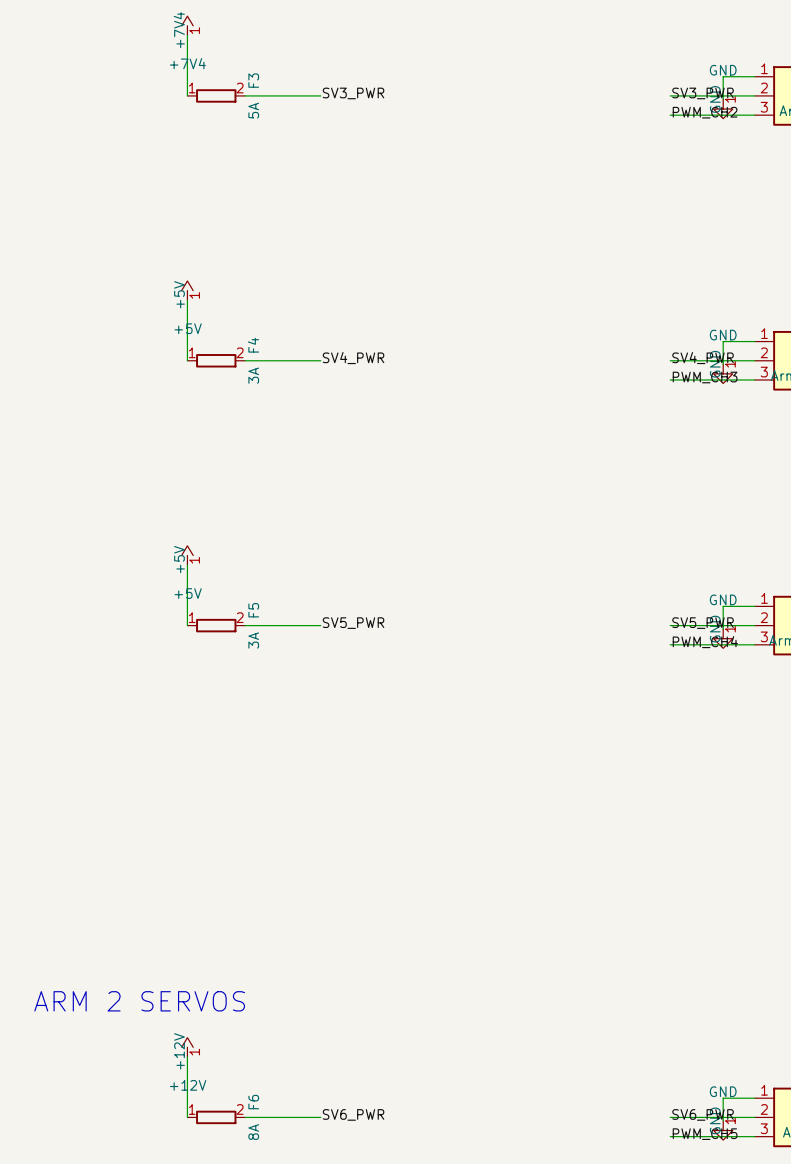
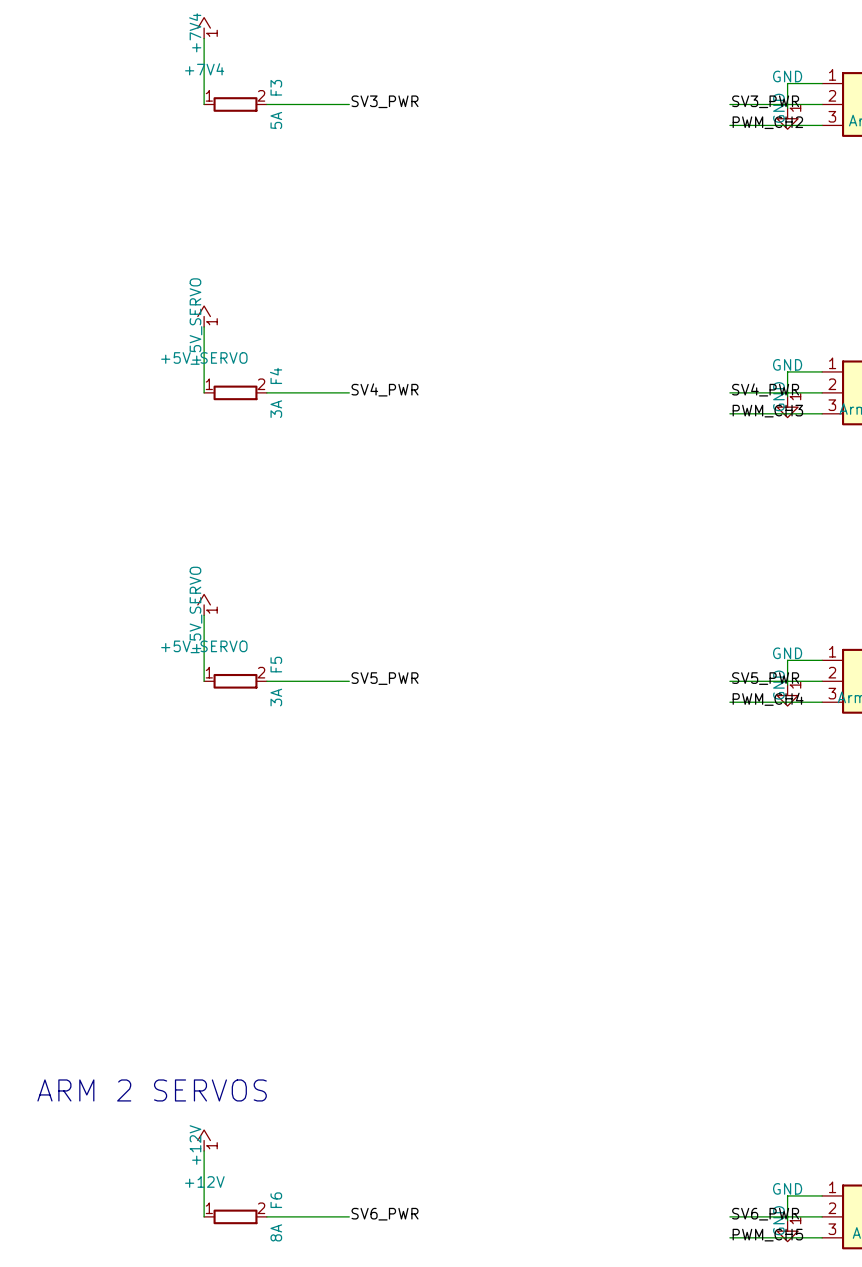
power symbol: +5V (187, 290) -> +5V_SERVO (204, 316)
power symbol: +5V (187, 555) -> +5V_SERVO (204, 604)

